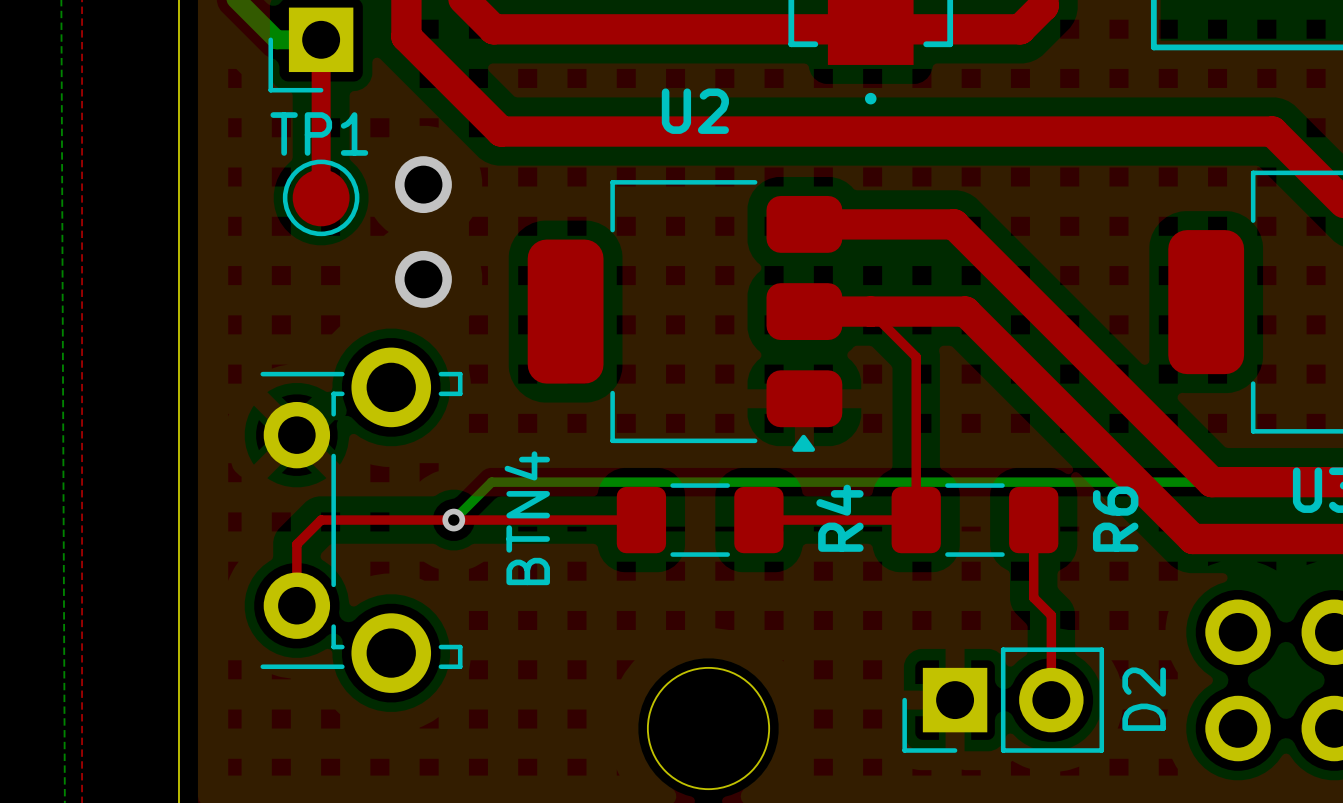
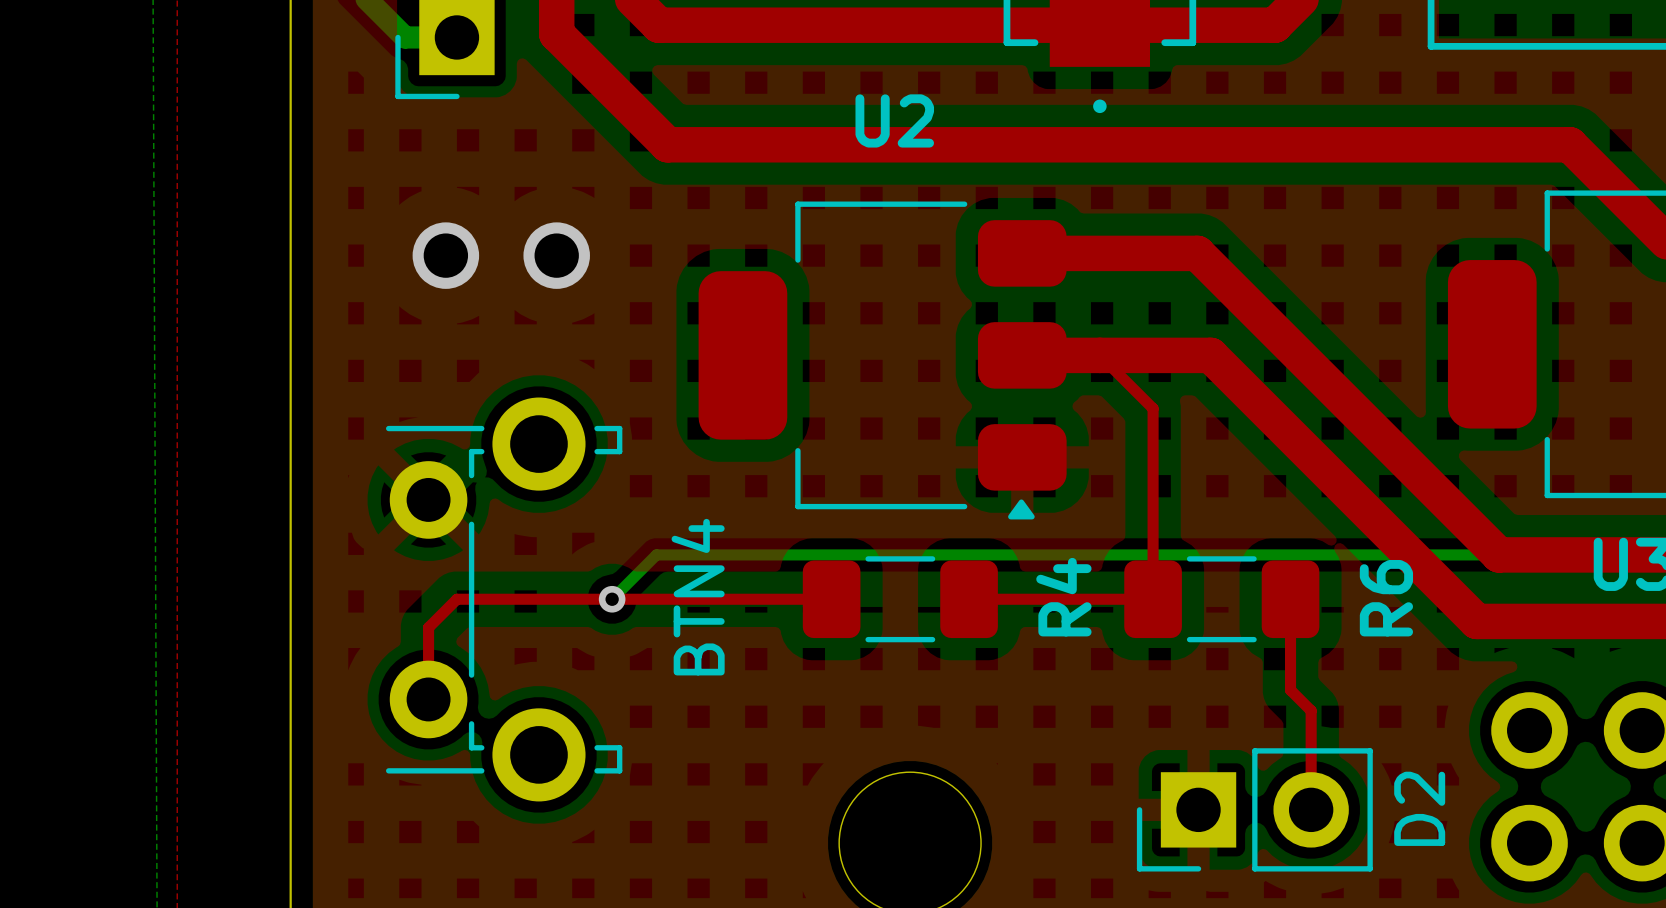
top track: (321, 39) (321, 197) -> none
via: (423, 184) -> none
TP1: (321, 197) -> none
via: none -> (445, 255)
via: none -> (556, 255)
via: (423, 279) -> none

